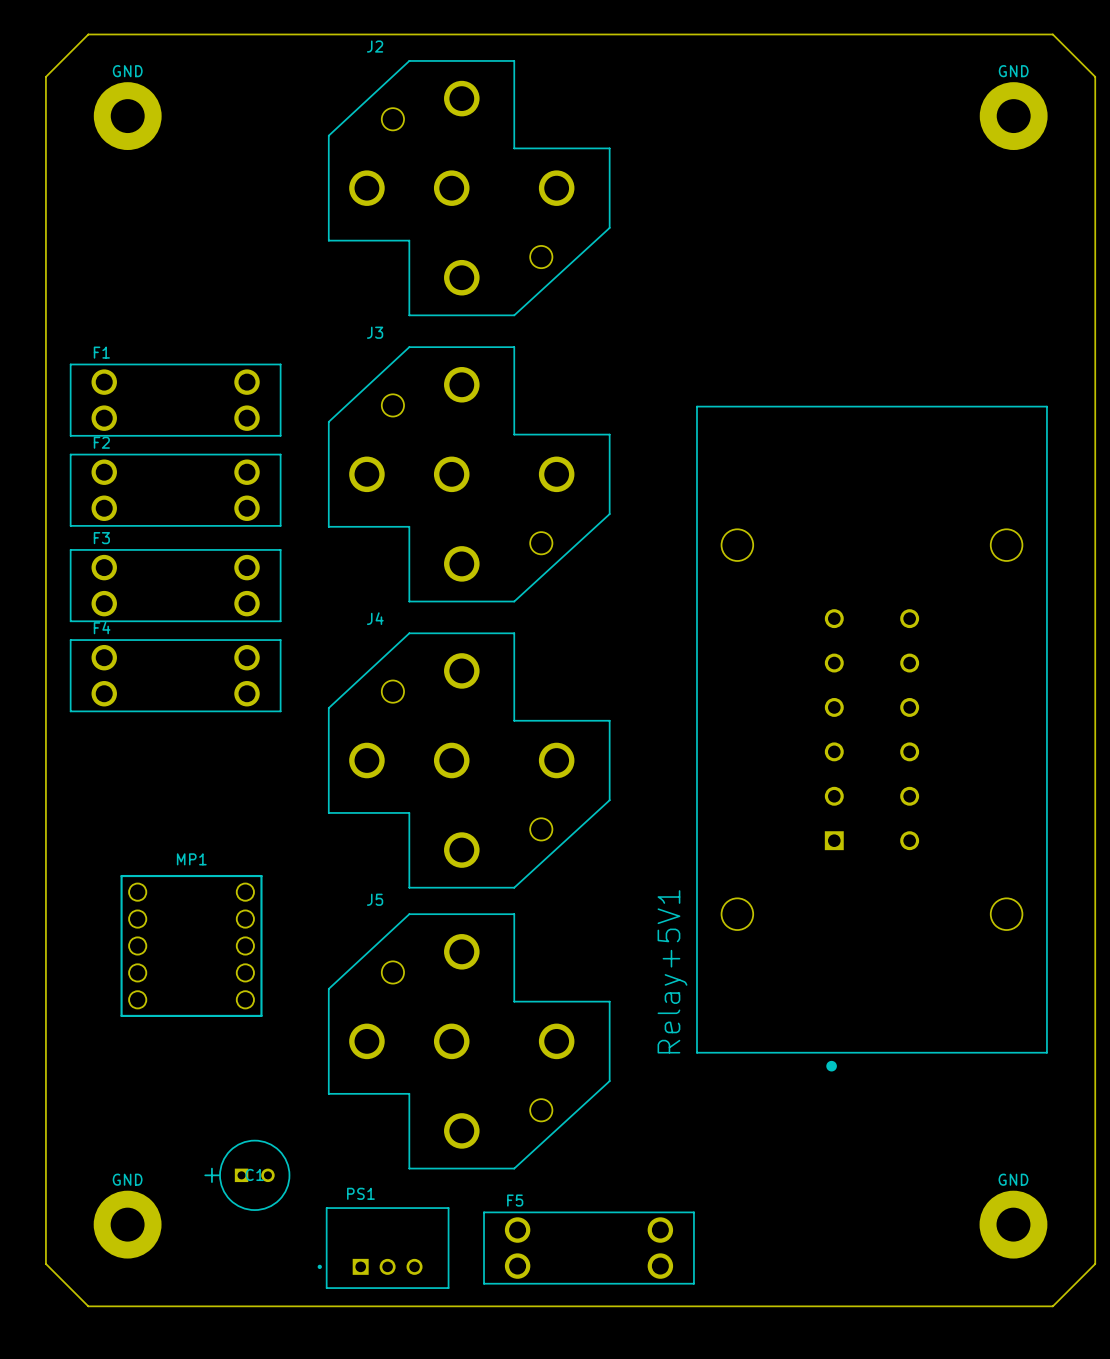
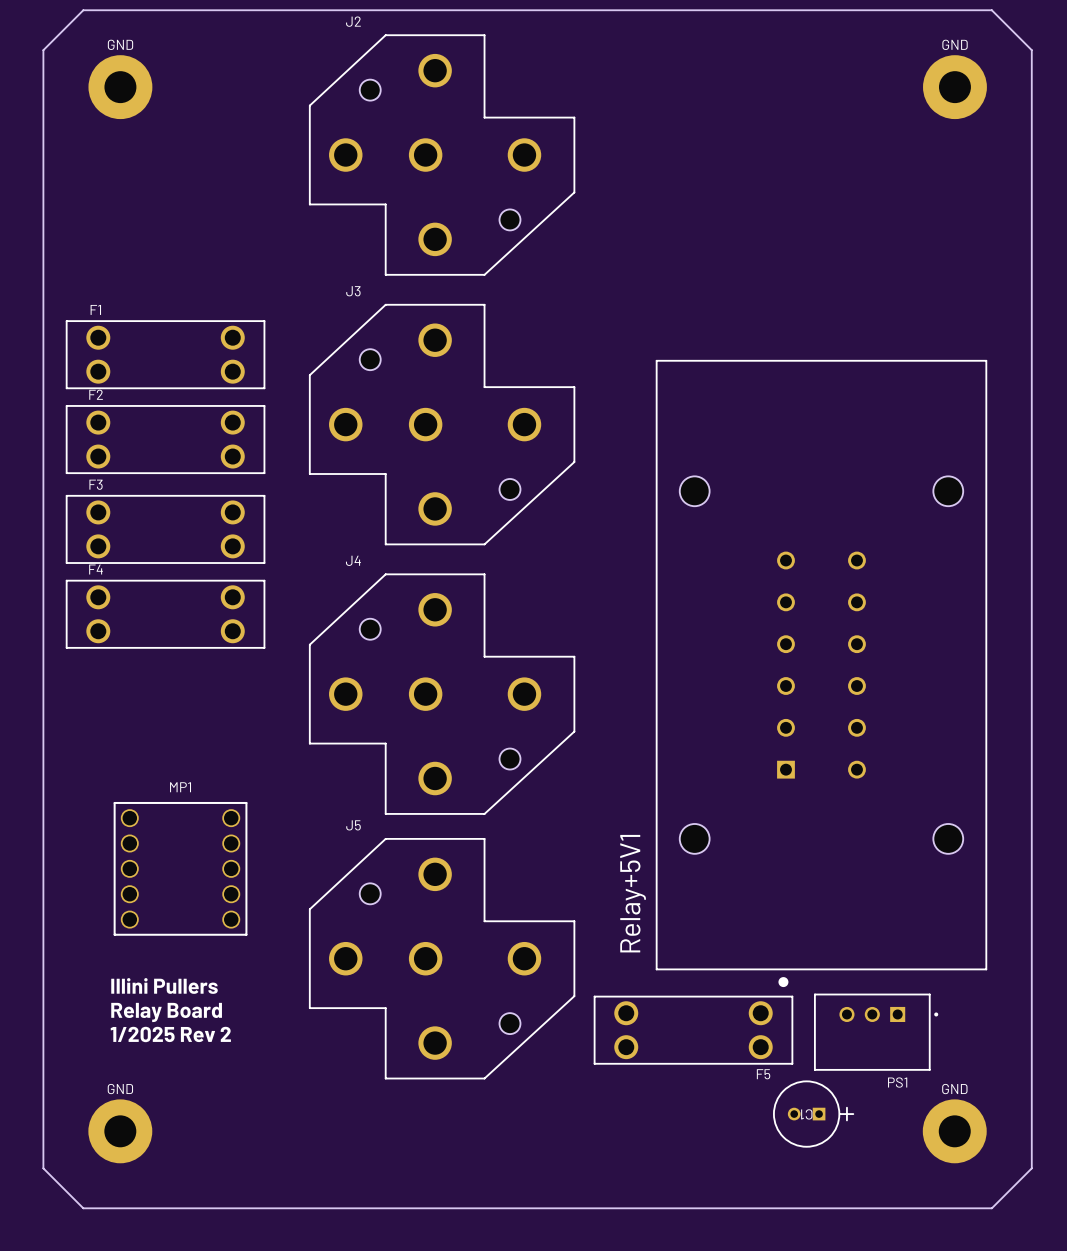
text: none -> Illini Pullers (164, 985)
text: none -> Relay Board (166, 1012)
text: none -> 1/2025 Rev 2 (170, 1034)
C1 rotation: 0° (247, 1175) -> 180° (813, 1114)
C1 position: (247, 1175) -> (813, 1114)
F5 name position: F5 (515, 1200) -> F5 (763, 1074)
PS1 rotation: 0° (383, 1248) -> 180° (876, 1032)
PS1 position: (383, 1248) -> (876, 1032)
F5 position: (588, 1248) -> (693, 1030)

